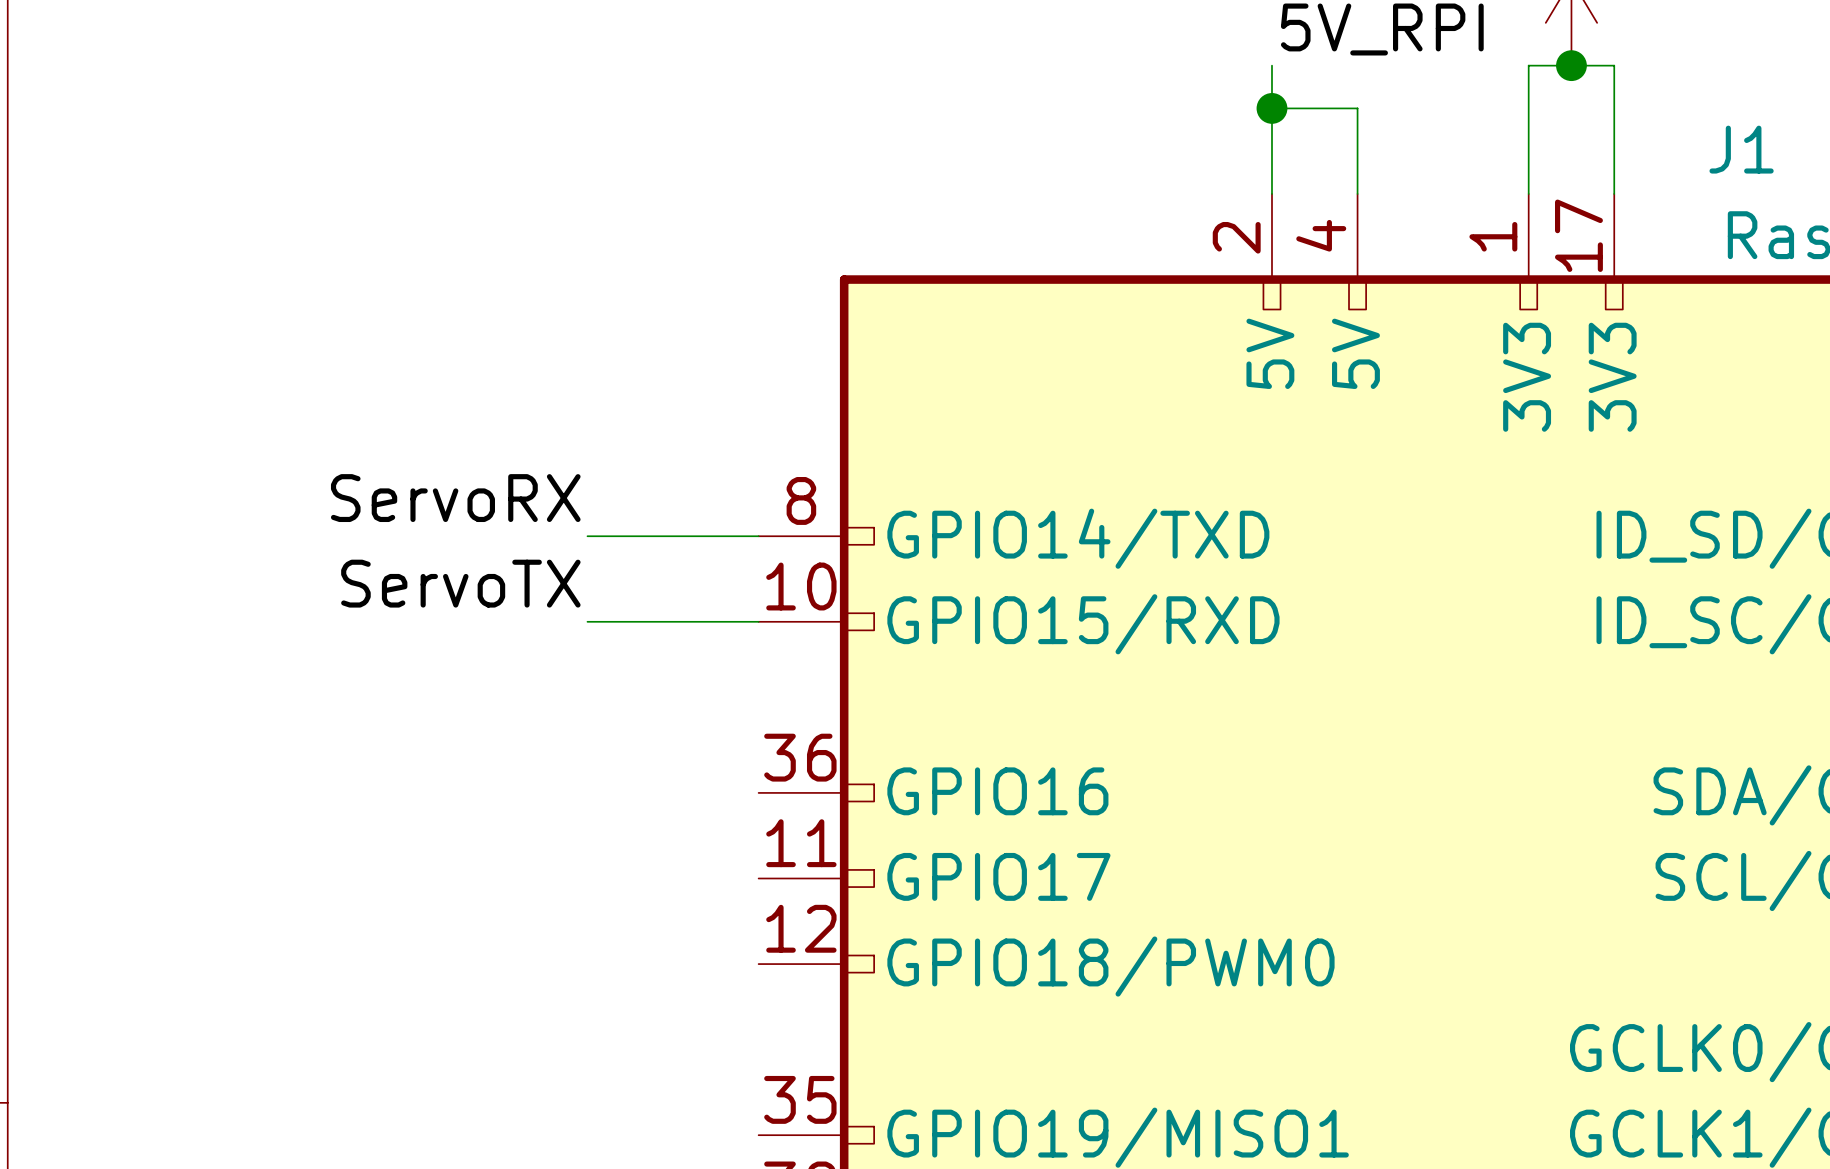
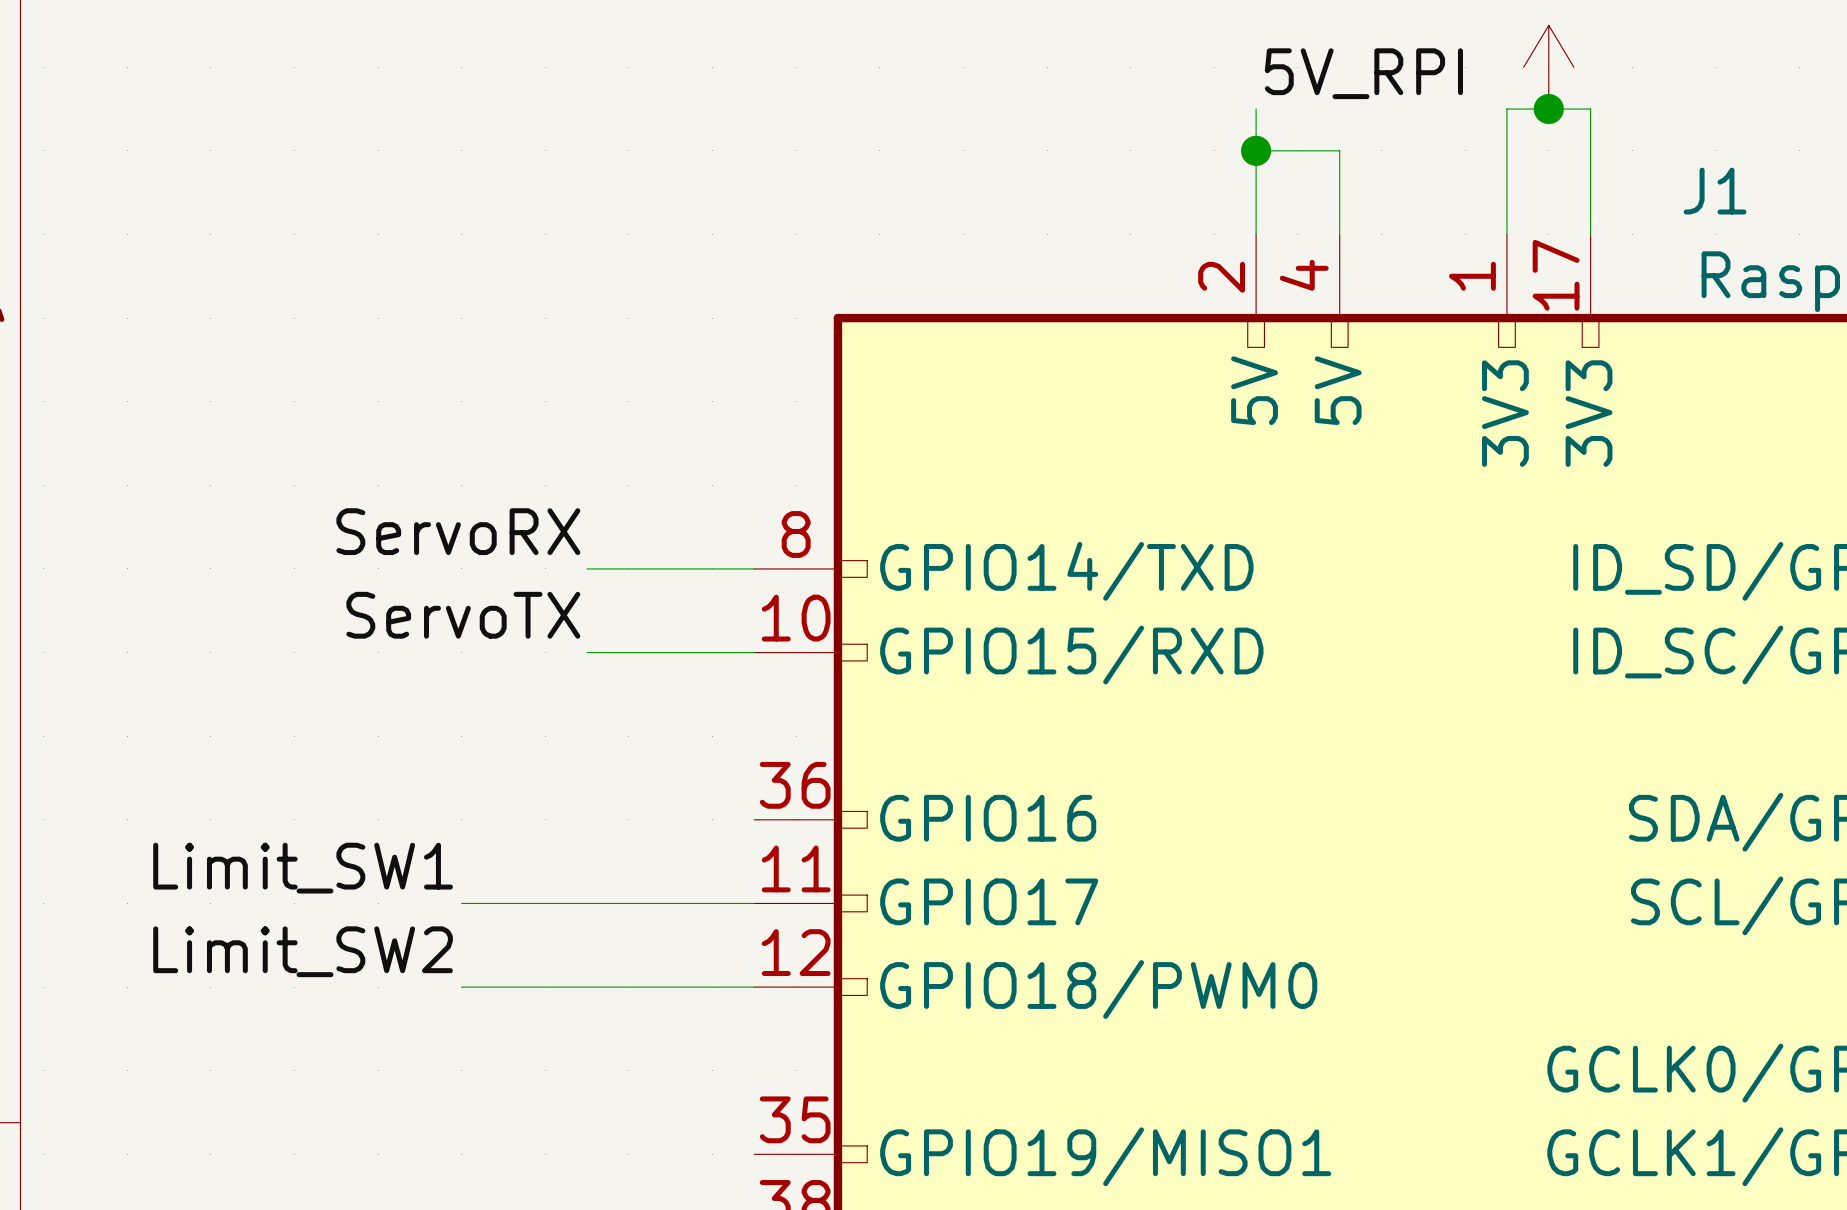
label: none -> Limit_SW1 (303, 868)
wire: none -> (461, 903) (754, 903)
label: none -> Limit_SW2 (303, 951)
wire: none -> (461, 987) (754, 987)

